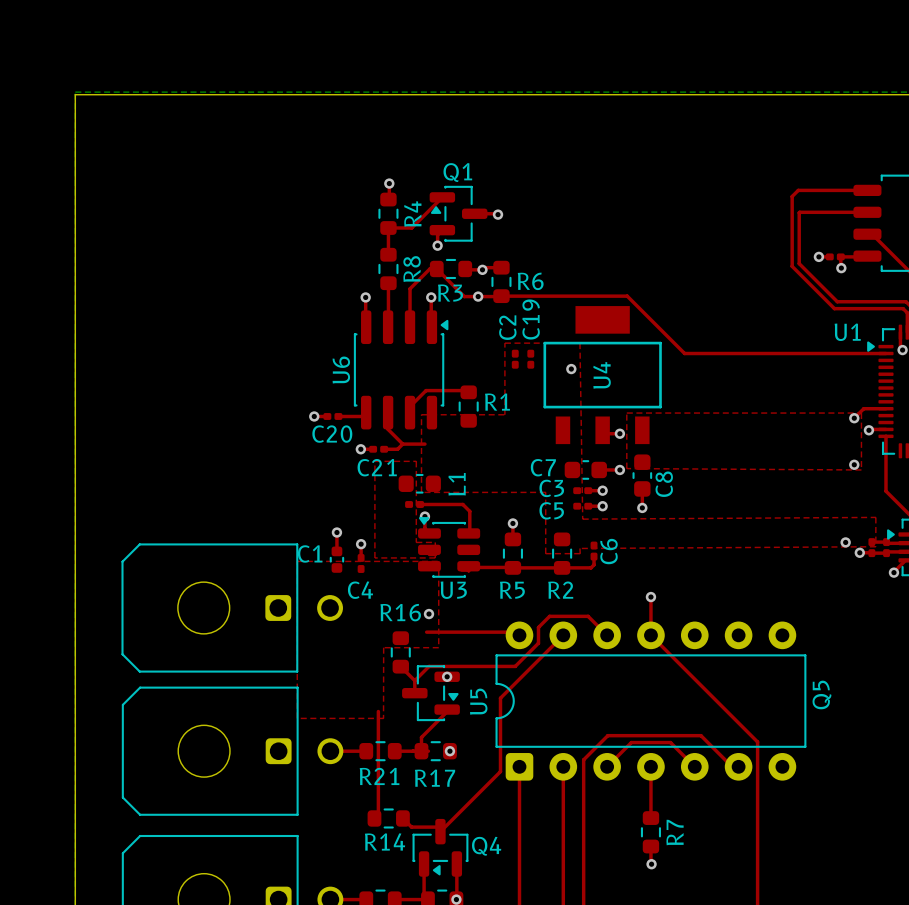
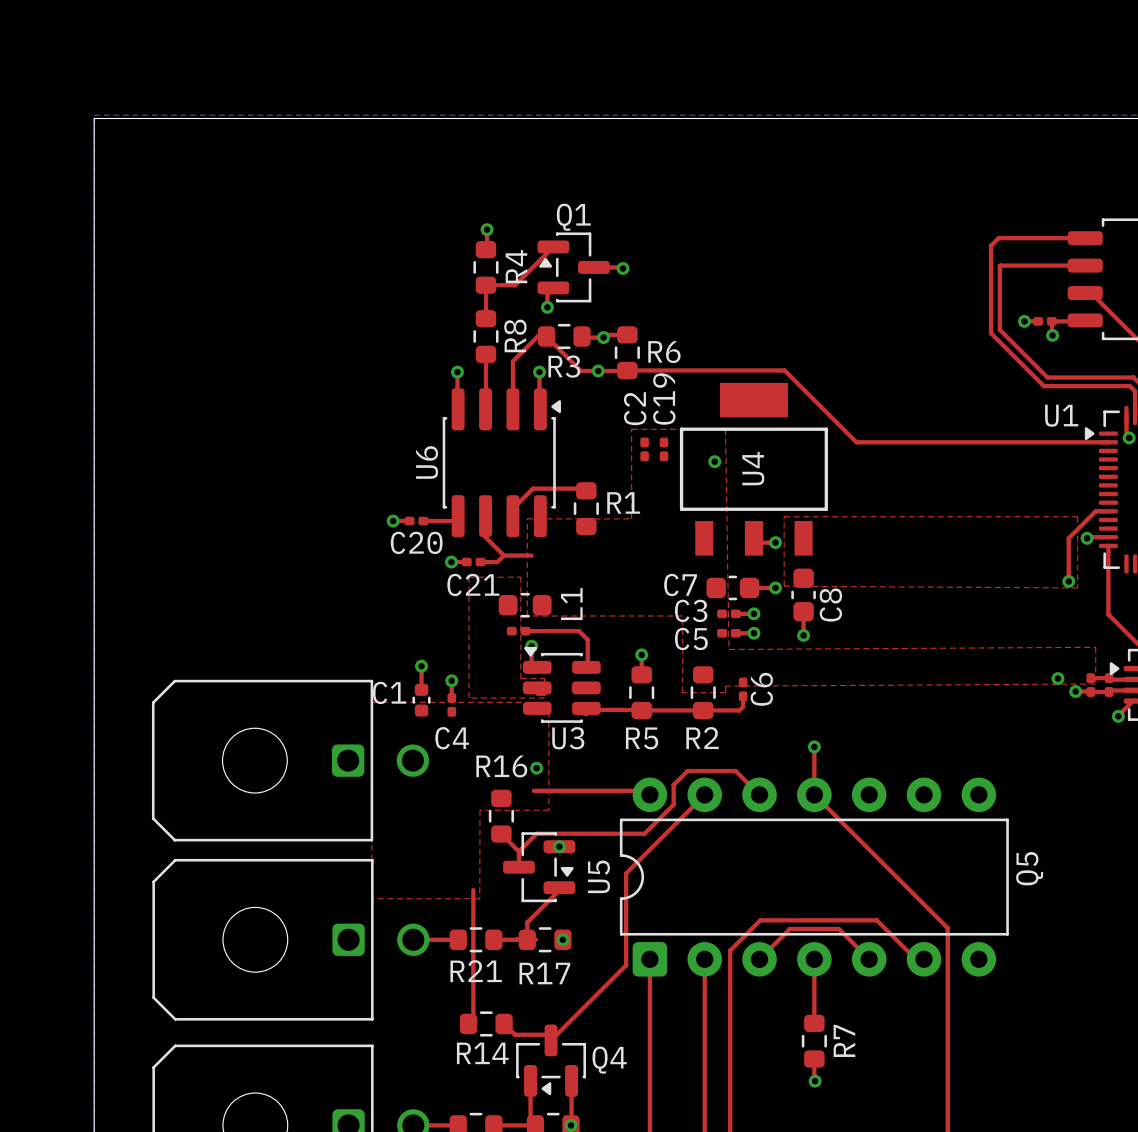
top track: (875, 408) (863, 408) (854, 418) -> (1095, 511) (1068, 538) (1068, 581)
via: (854, 418) -> none

